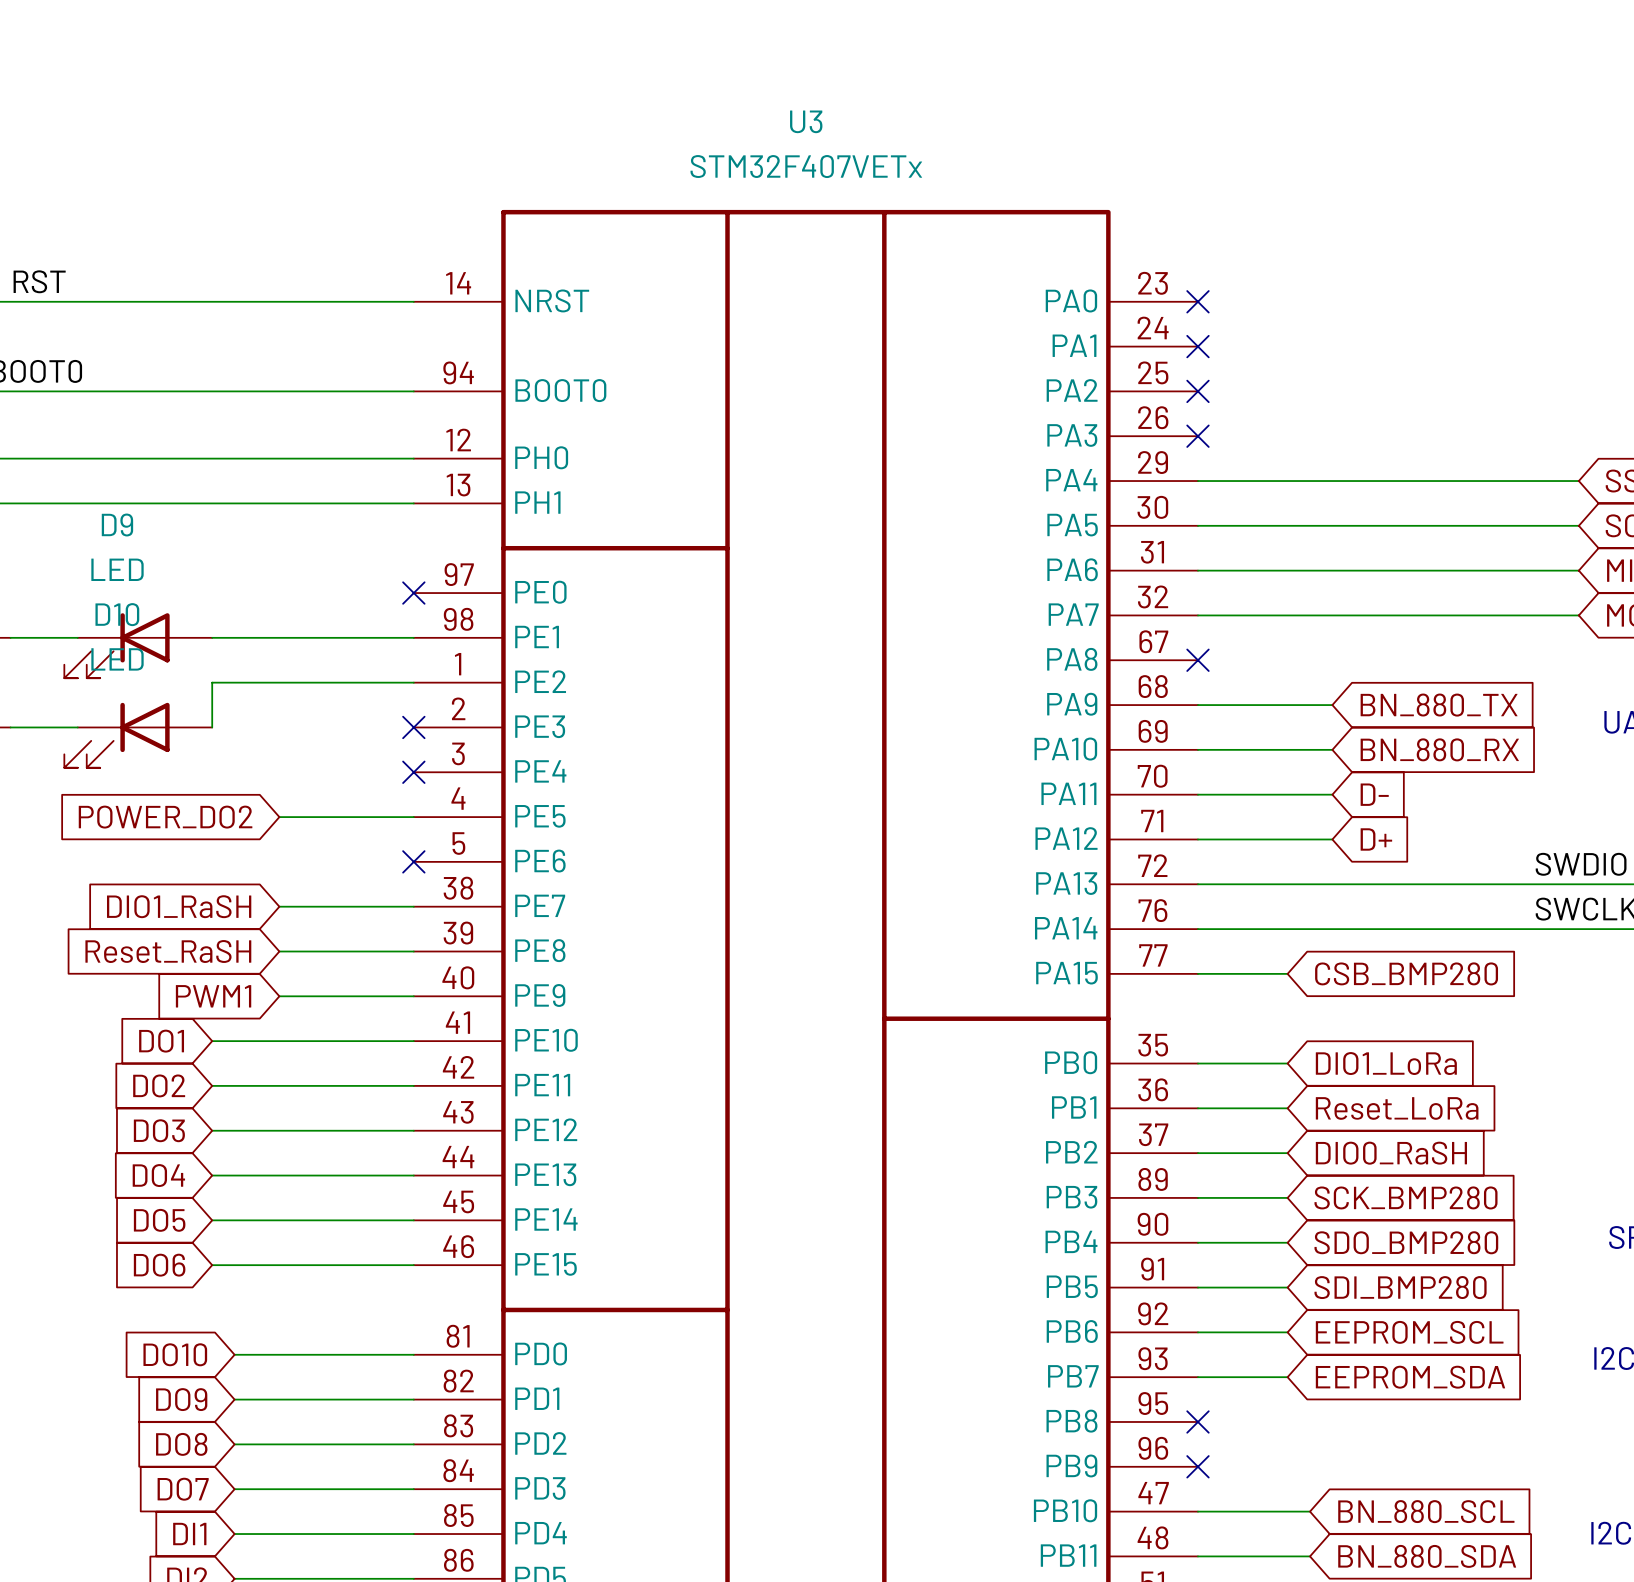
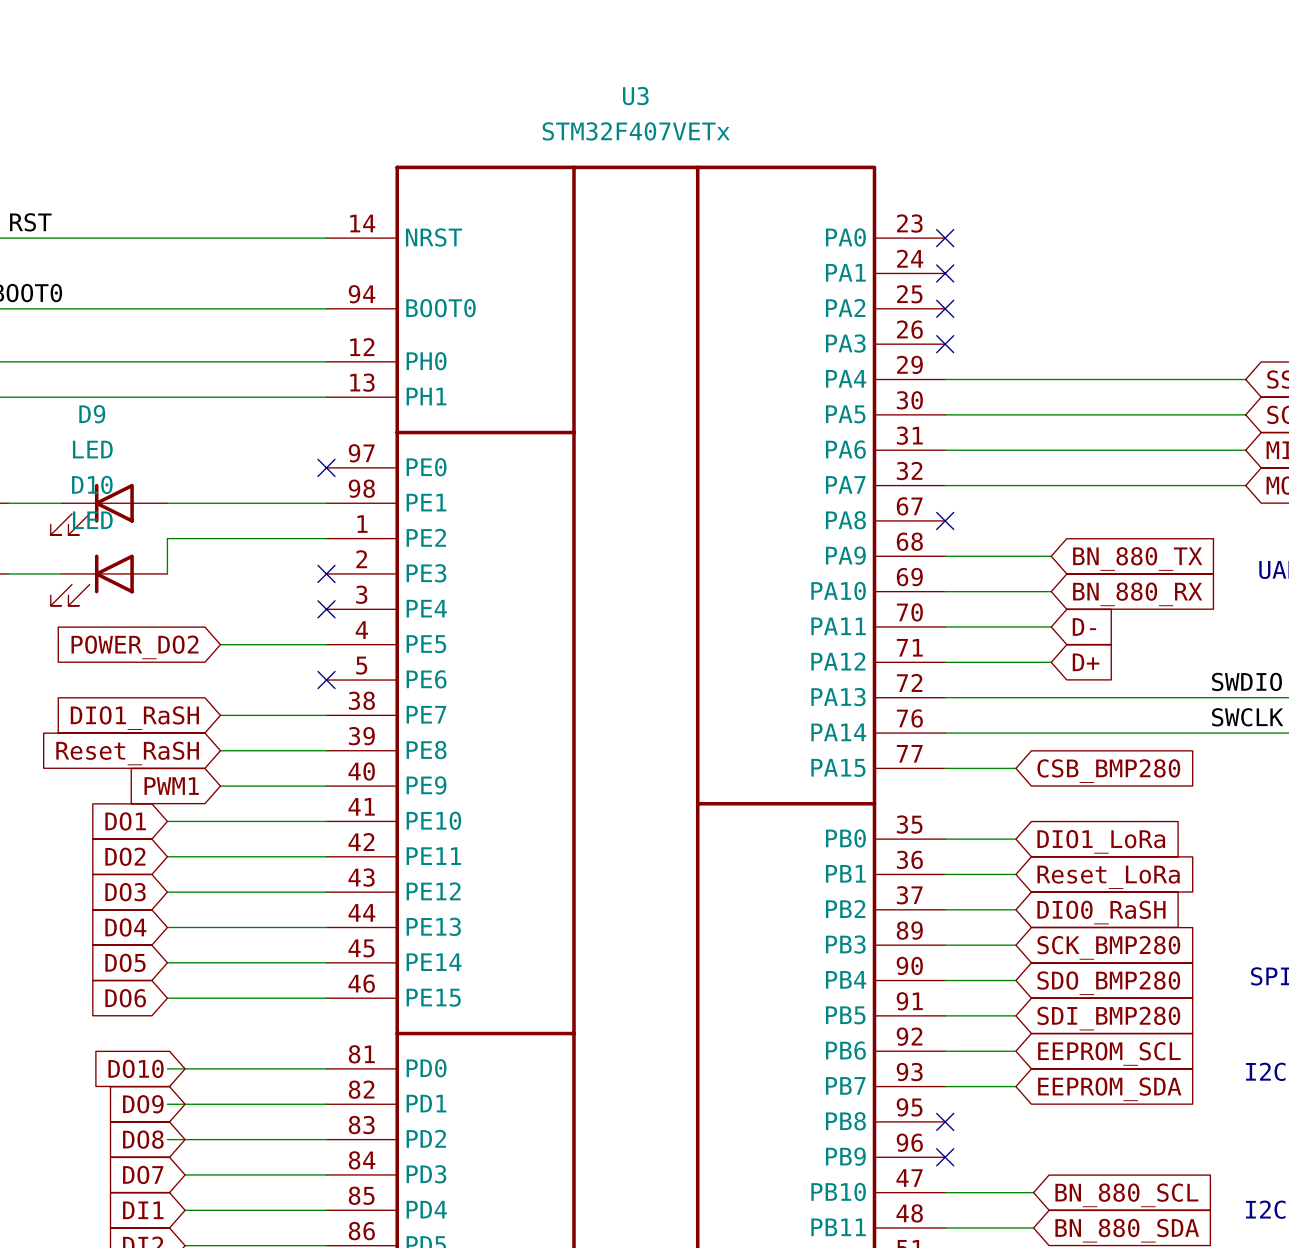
wire: none -> (167, 1068) (185, 1068)
wire: none -> (167, 1104) (185, 1104)
wire: none -> (167, 1139) (185, 1139)

